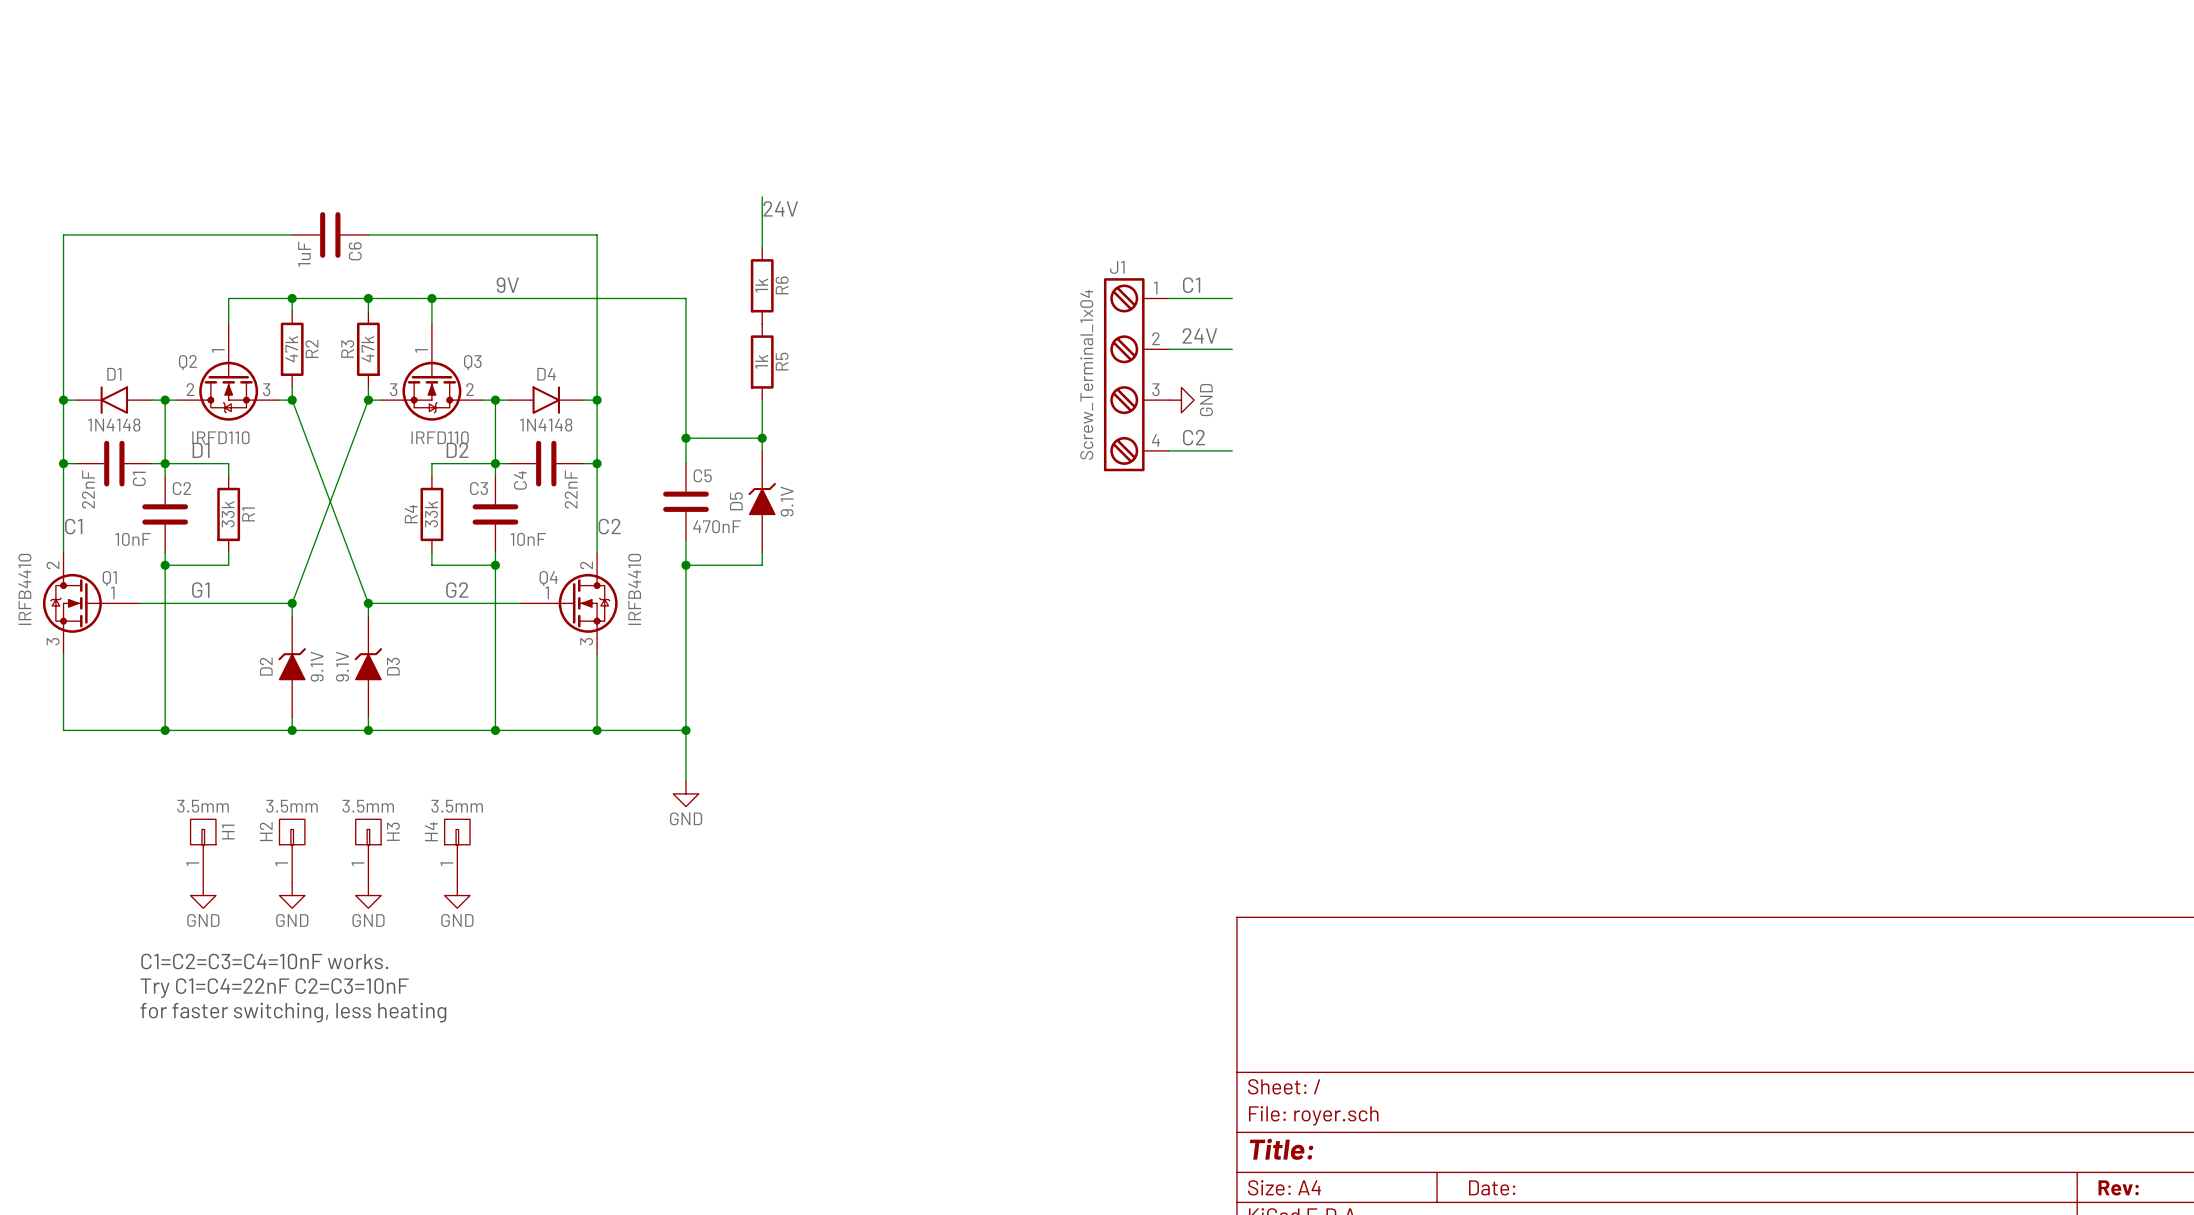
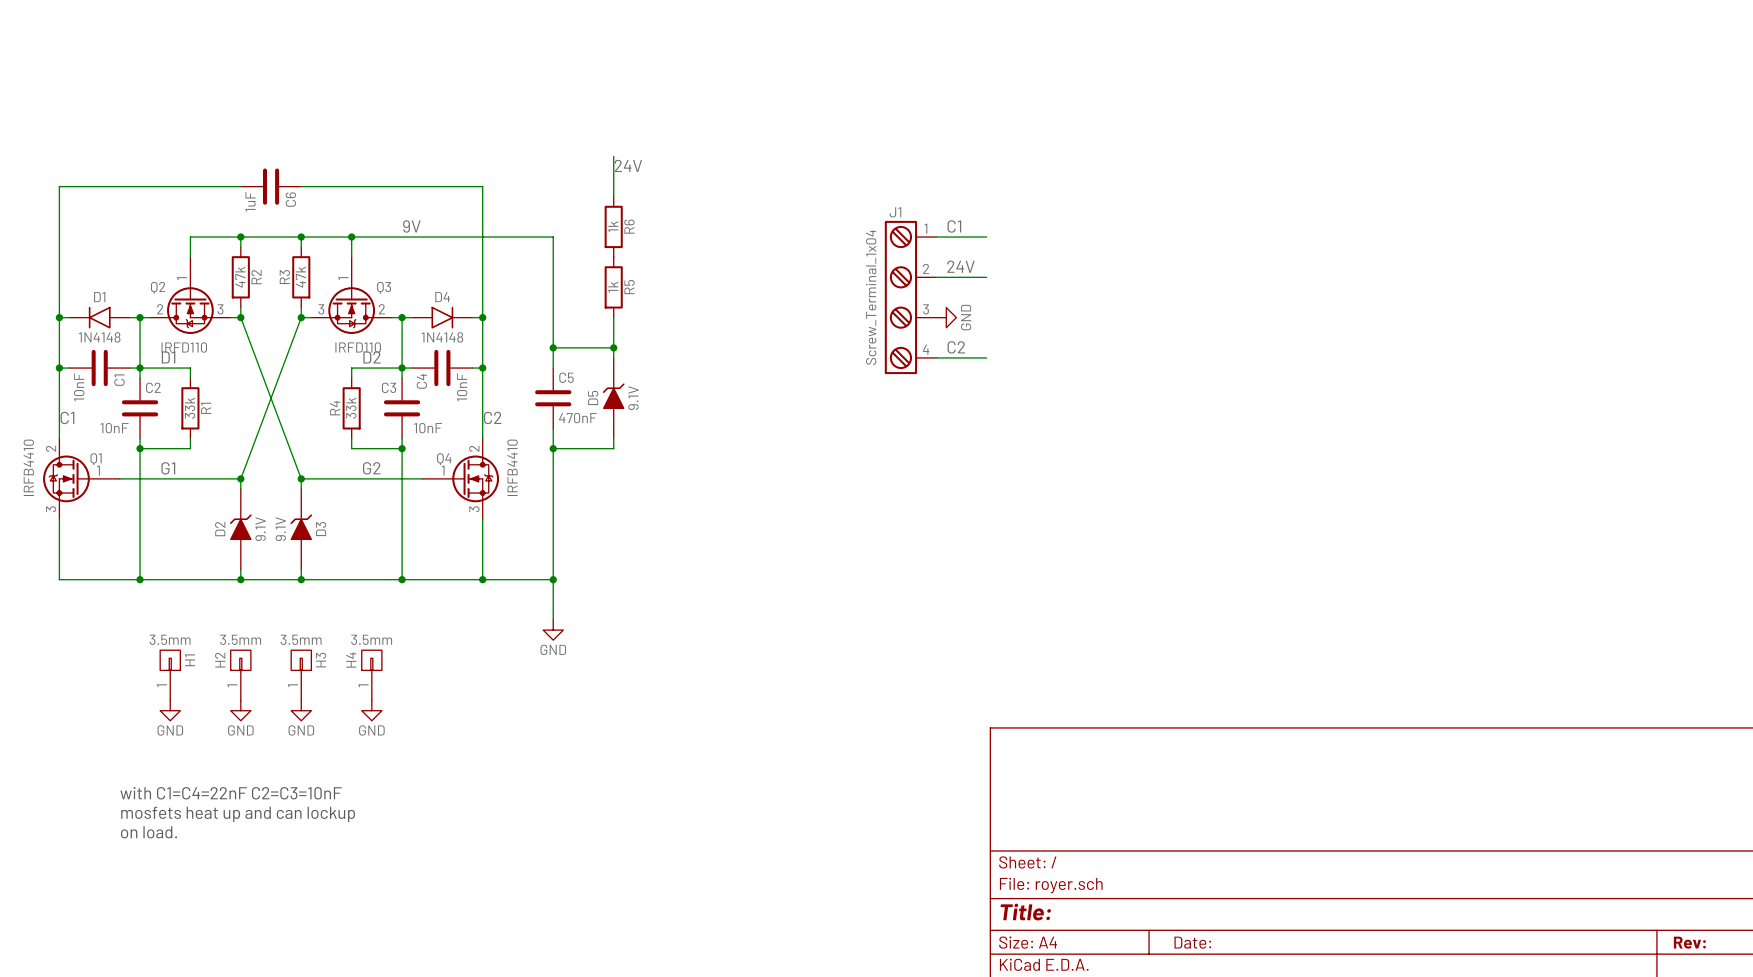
C1 value: 22nF (88, 489) -> 10nF (79, 387)
C4 value: 22nF (571, 489) -> 10nF (462, 387)
text: C1=C2=C3=C4=10nF works. (264, 961) -> none
text: Try C1=C4=22nF C2=C3=10nF (274, 988) -> with C1=C4=22nF C2=C3=10nF (231, 793)
text: for faster switching, less heating (293, 1012) -> none
text: none -> mosfets heat up and can lockup (238, 814)
text: none -> on load. (149, 832)

